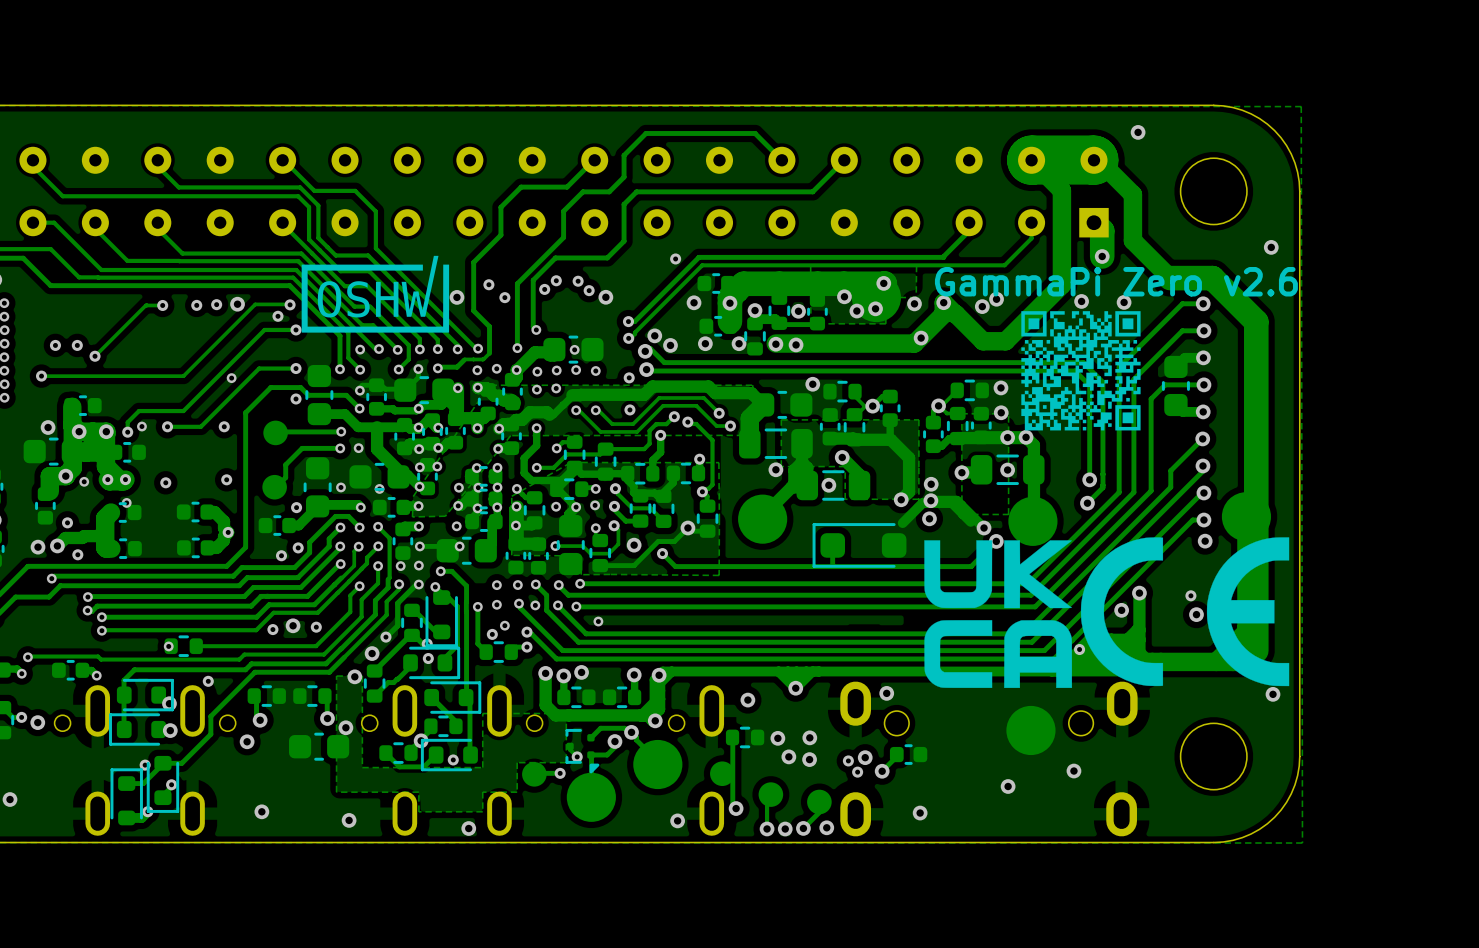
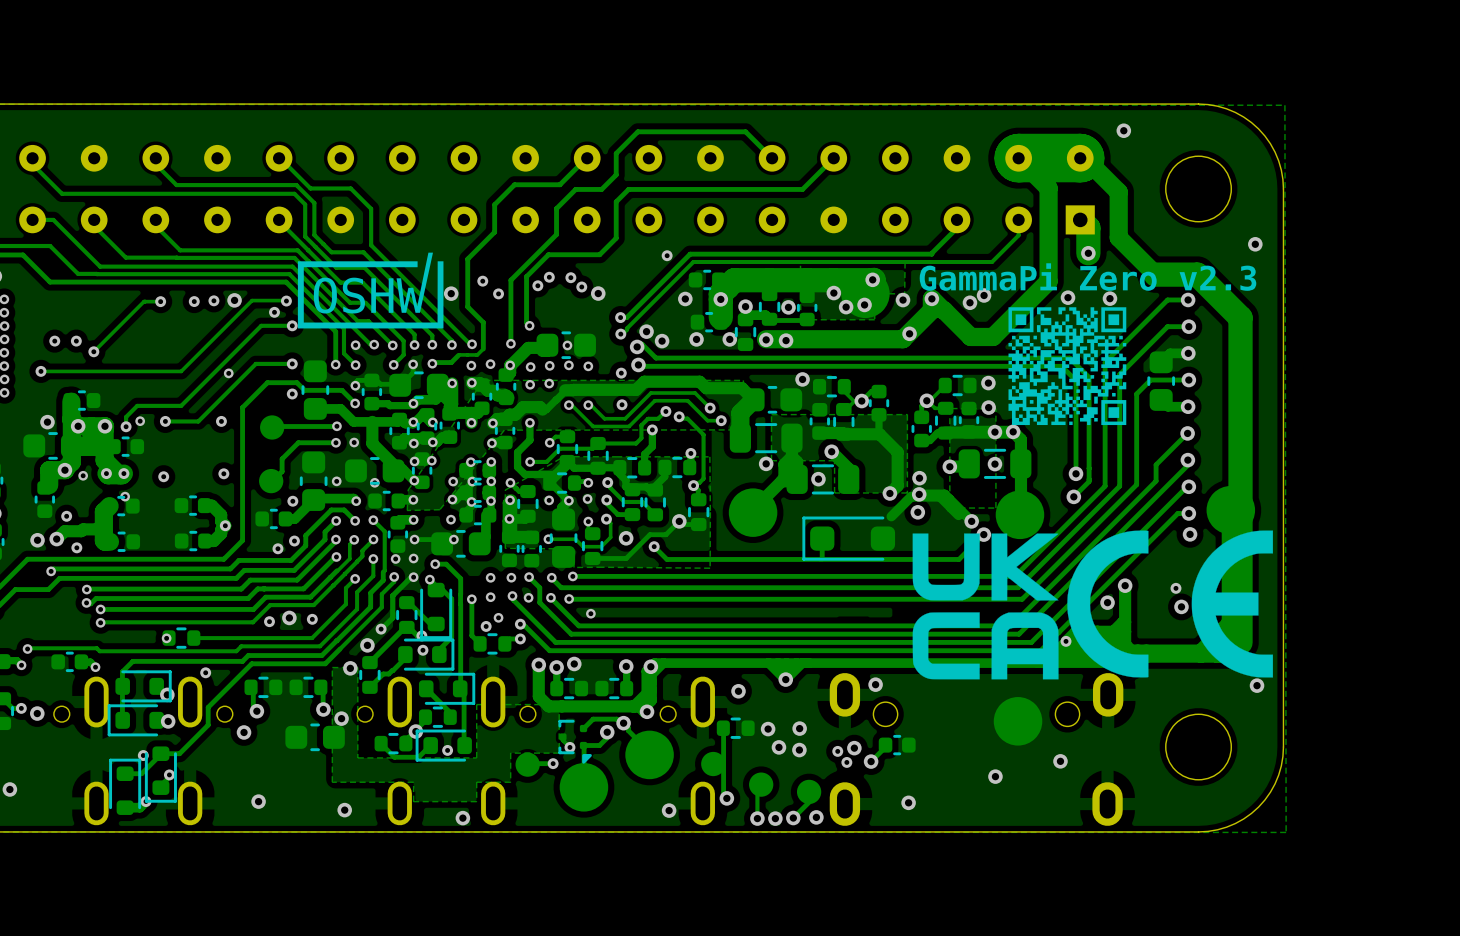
text: GammaPi Zero v2.6 (1116, 281) -> GammaPi Zero v2.3 (1087, 277)

